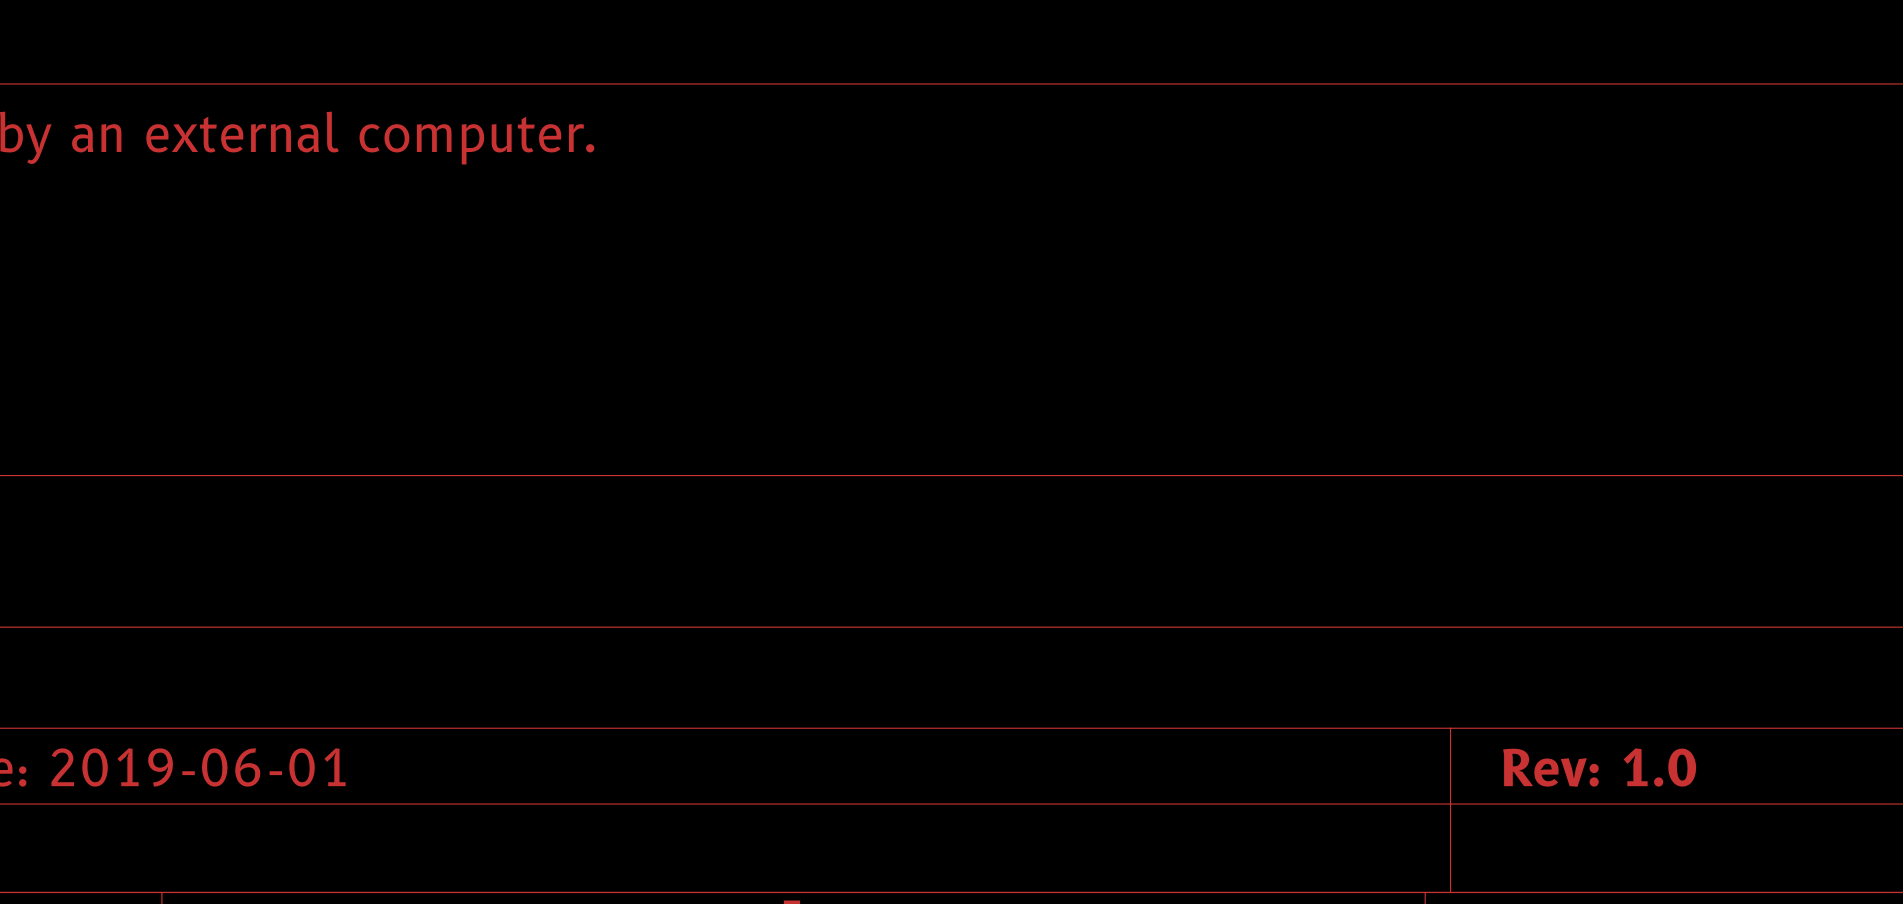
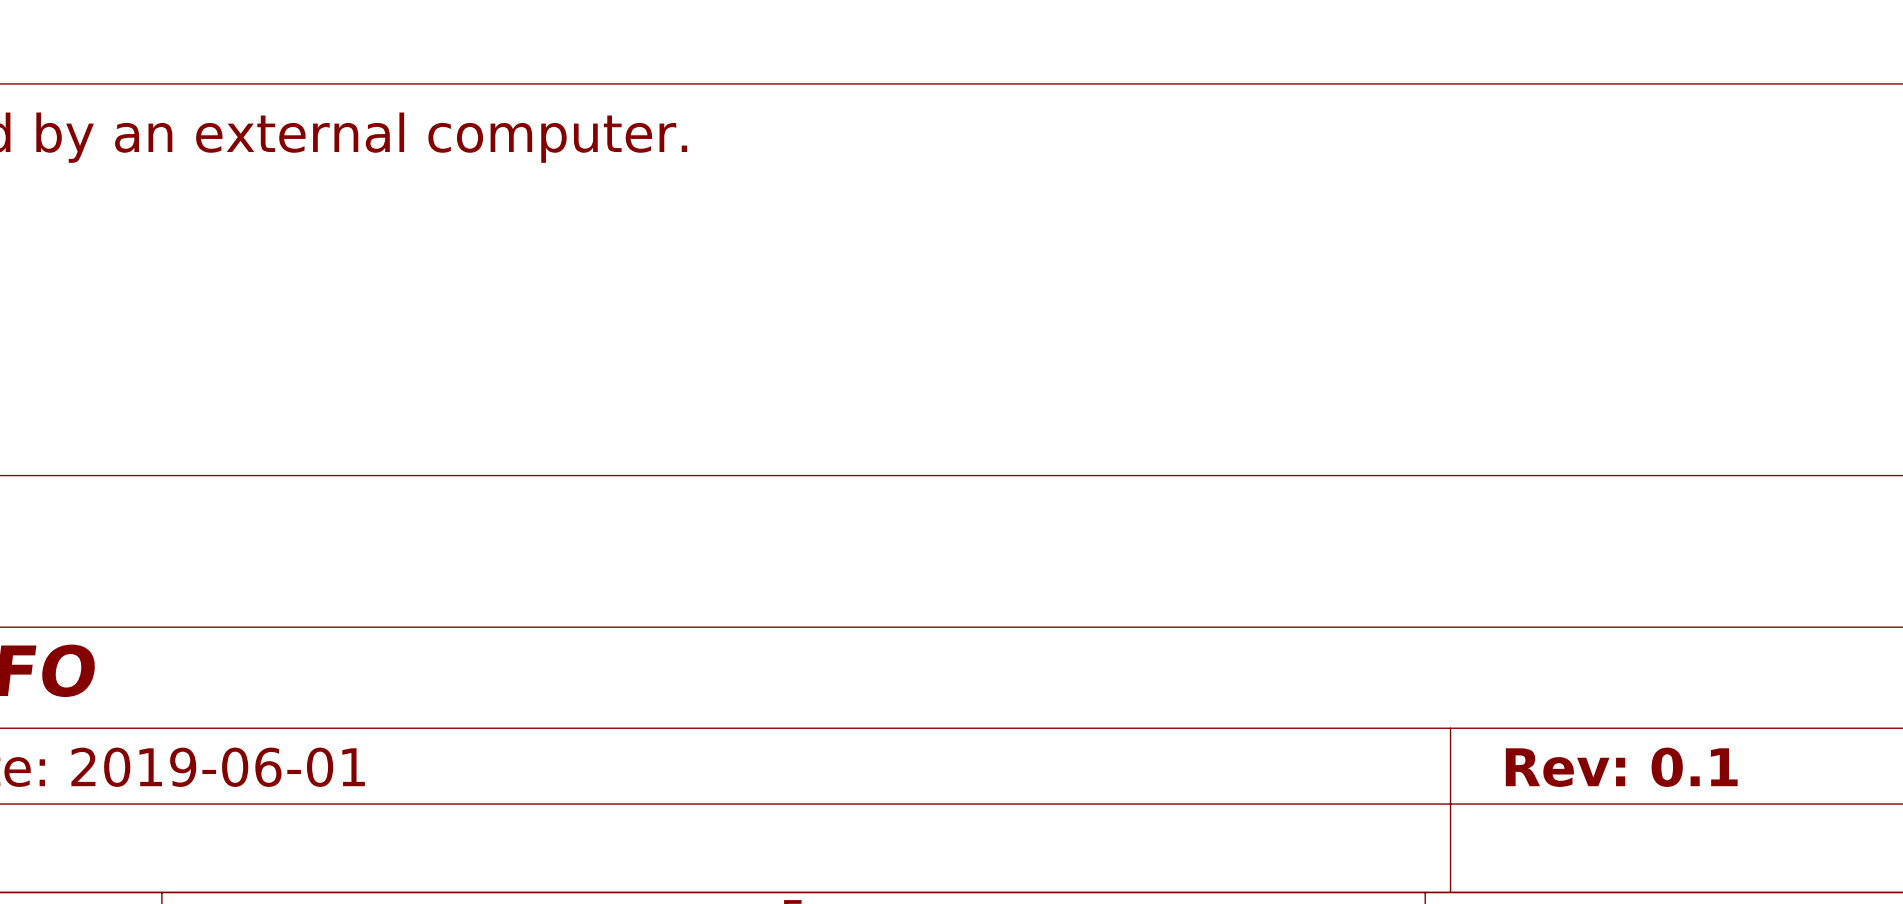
title block: Rev: 1.0 (1599, 767) -> Rev: 0.1 (1621, 767)

